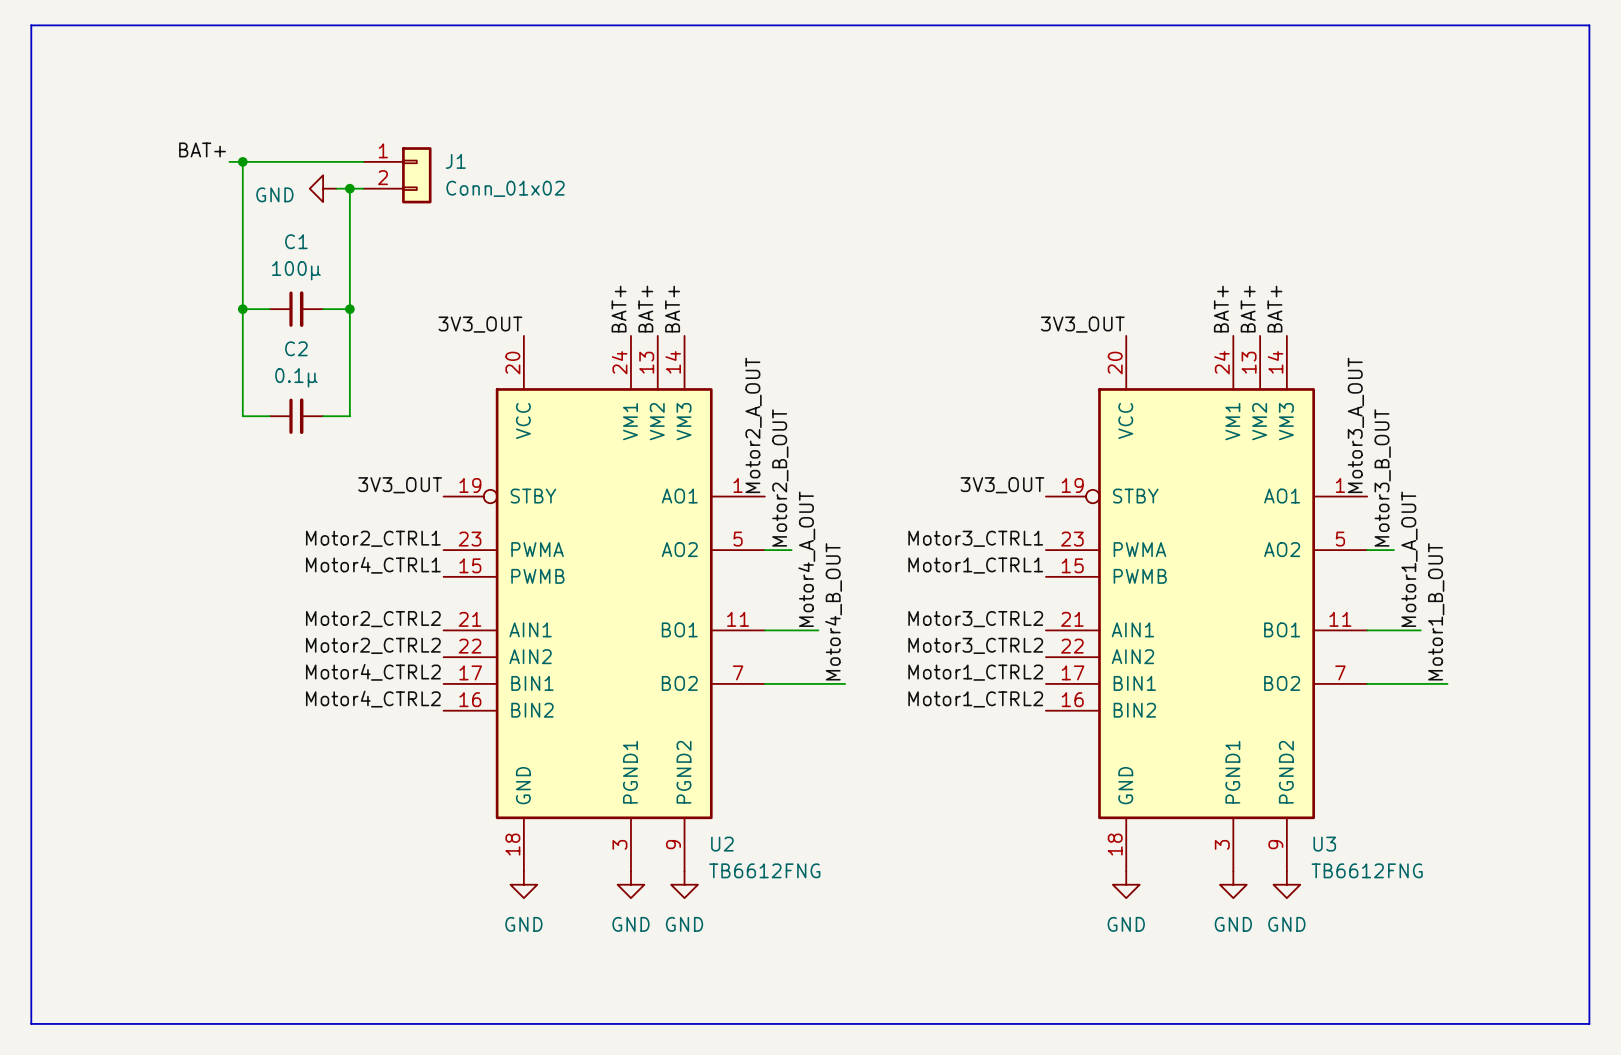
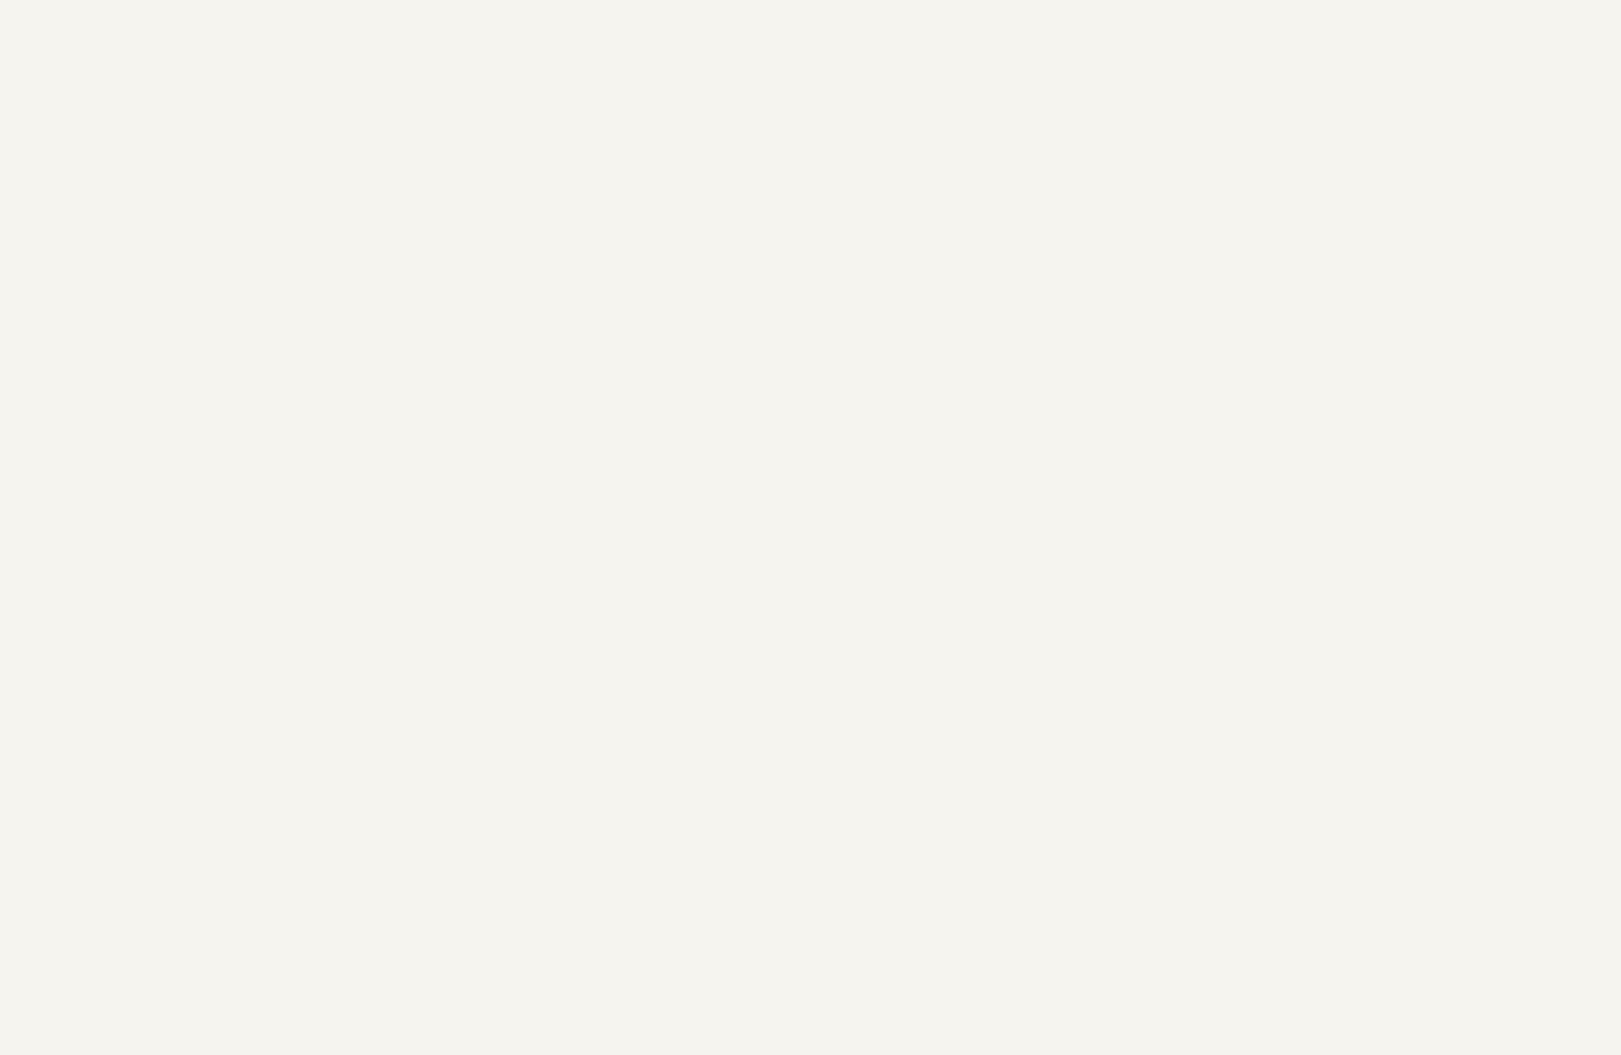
line: (31, 25) (1589, 25) (1589, 1023) (31, 1023) (31, 25) -> none
label: BAT+ (202, 149) -> none
wire: (229, 161) (363, 161) -> none
wire: (242, 161) (242, 416) (269, 416) -> none
junction: (242, 161) -> none
J1: Conn_01x02 (397, 175) -> none
power symbol: GND (323, 188) -> none
wire: (336, 188) (363, 188) -> none
wire: (349, 188) (349, 416) (323, 416) -> none
junction: (349, 188) -> none
wire: (242, 309) (269, 309) -> none
junction: (242, 309) -> none
C1: 100µ (296, 309) -> none
wire: (323, 309) (349, 309) -> none
junction: (349, 309) -> none
label: BAT+ (619, 309) -> none
label: BAT+ (645, 309) -> none
label: BAT+ (672, 309) -> none
label: BAT+ (1221, 309) -> none
label: BAT+ (1248, 309) -> none
label: BAT+ (1274, 309) -> none
label: 3V3_OUT (480, 324) -> none
label: 3V3_OUT (1082, 324) -> none
C2: 0.1µ (296, 416) -> none
label: Motor2_A_OUT (753, 425) -> none
label: Motor3_A_OUT (1355, 425) -> none
label: Motor2_B_OUT (780, 477) -> none
label: Motor3_B_OUT (1382, 477) -> none
label: 3V3_OUT (400, 485) -> none
label: 3V3_OUT (1002, 485) -> none
label: Motor2_CTRL1 (373, 538) -> none
label: Motor3_CTRL1 (975, 538) -> none
wire: (764, 550) (791, 550) -> none
wire: (1367, 550) (1393, 550) -> none
label: Motor4_A_OUT (806, 559) -> none
label: Motor1_A_OUT (1409, 559) -> none
label: Motor4_CTRL1 (373, 565) -> none
label: Motor1_CTRL1 (975, 565) -> none
U2: TB6612FNG (604, 603) -> none
U3: TB6612FNG (1206, 603) -> none
label: Motor4_B_OUT (833, 611) -> none
label: Motor1_B_OUT (1436, 611) -> none
label: Motor2_CTRL2 (373, 619) -> none
label: Motor3_CTRL2 (975, 619) -> none
wire: (764, 630) (818, 630) -> none
wire: (1367, 630) (1420, 630) -> none
label: Motor2_CTRL2 (373, 645) -> none
label: Motor3_CTRL2 (975, 645) -> none
label: Motor4_CTRL2 (373, 672) -> none
label: Motor1_CTRL2 (975, 672) -> none
wire: (764, 683) (845, 683) -> none
wire: (1367, 683) (1447, 683) -> none
label: Motor4_CTRL2 (373, 699) -> none
label: Motor1_CTRL2 (975, 699) -> none
power symbol: GND (523, 884) -> none
power symbol: GND (630, 884) -> none
power symbol: GND (684, 884) -> none
power symbol: GND (1126, 884) -> none
power symbol: GND (1233, 884) -> none
power symbol: GND (1286, 884) -> none

